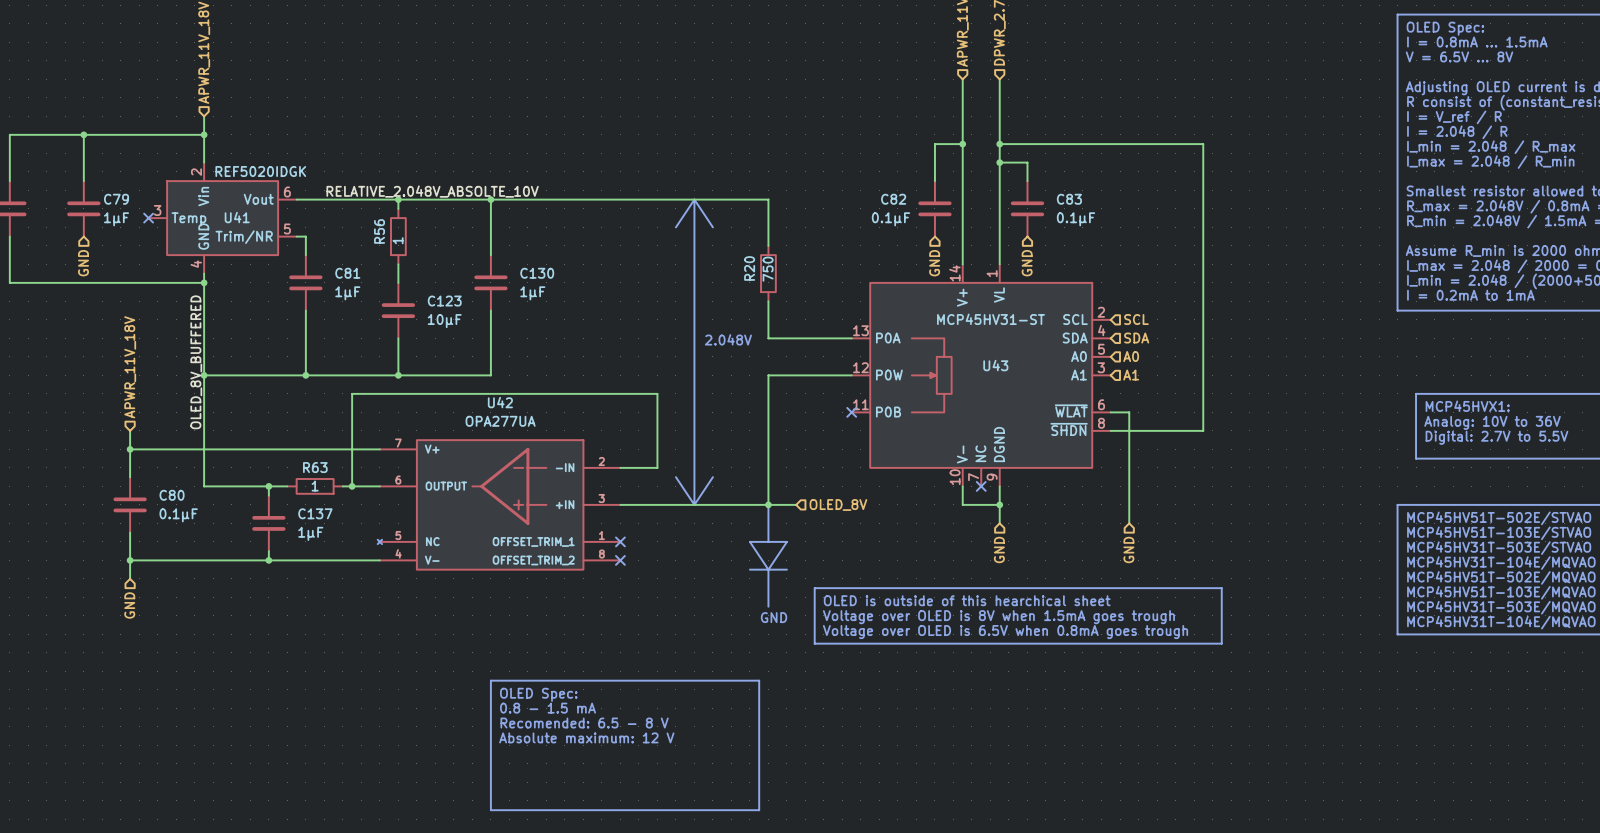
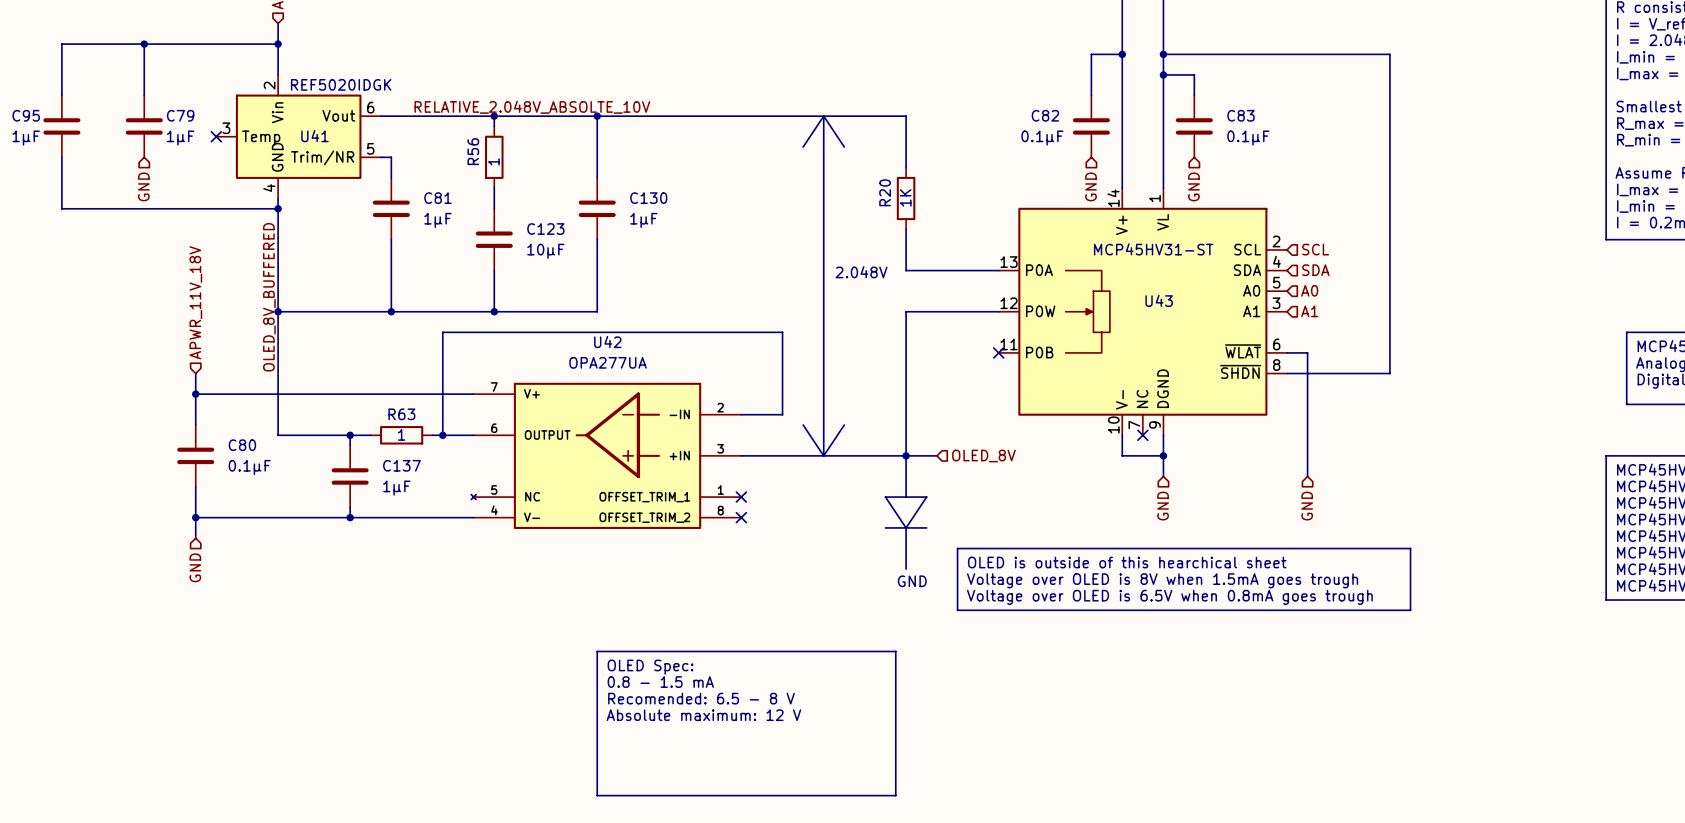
R20 value: 750 (768, 269) -> 1K (905, 197)

